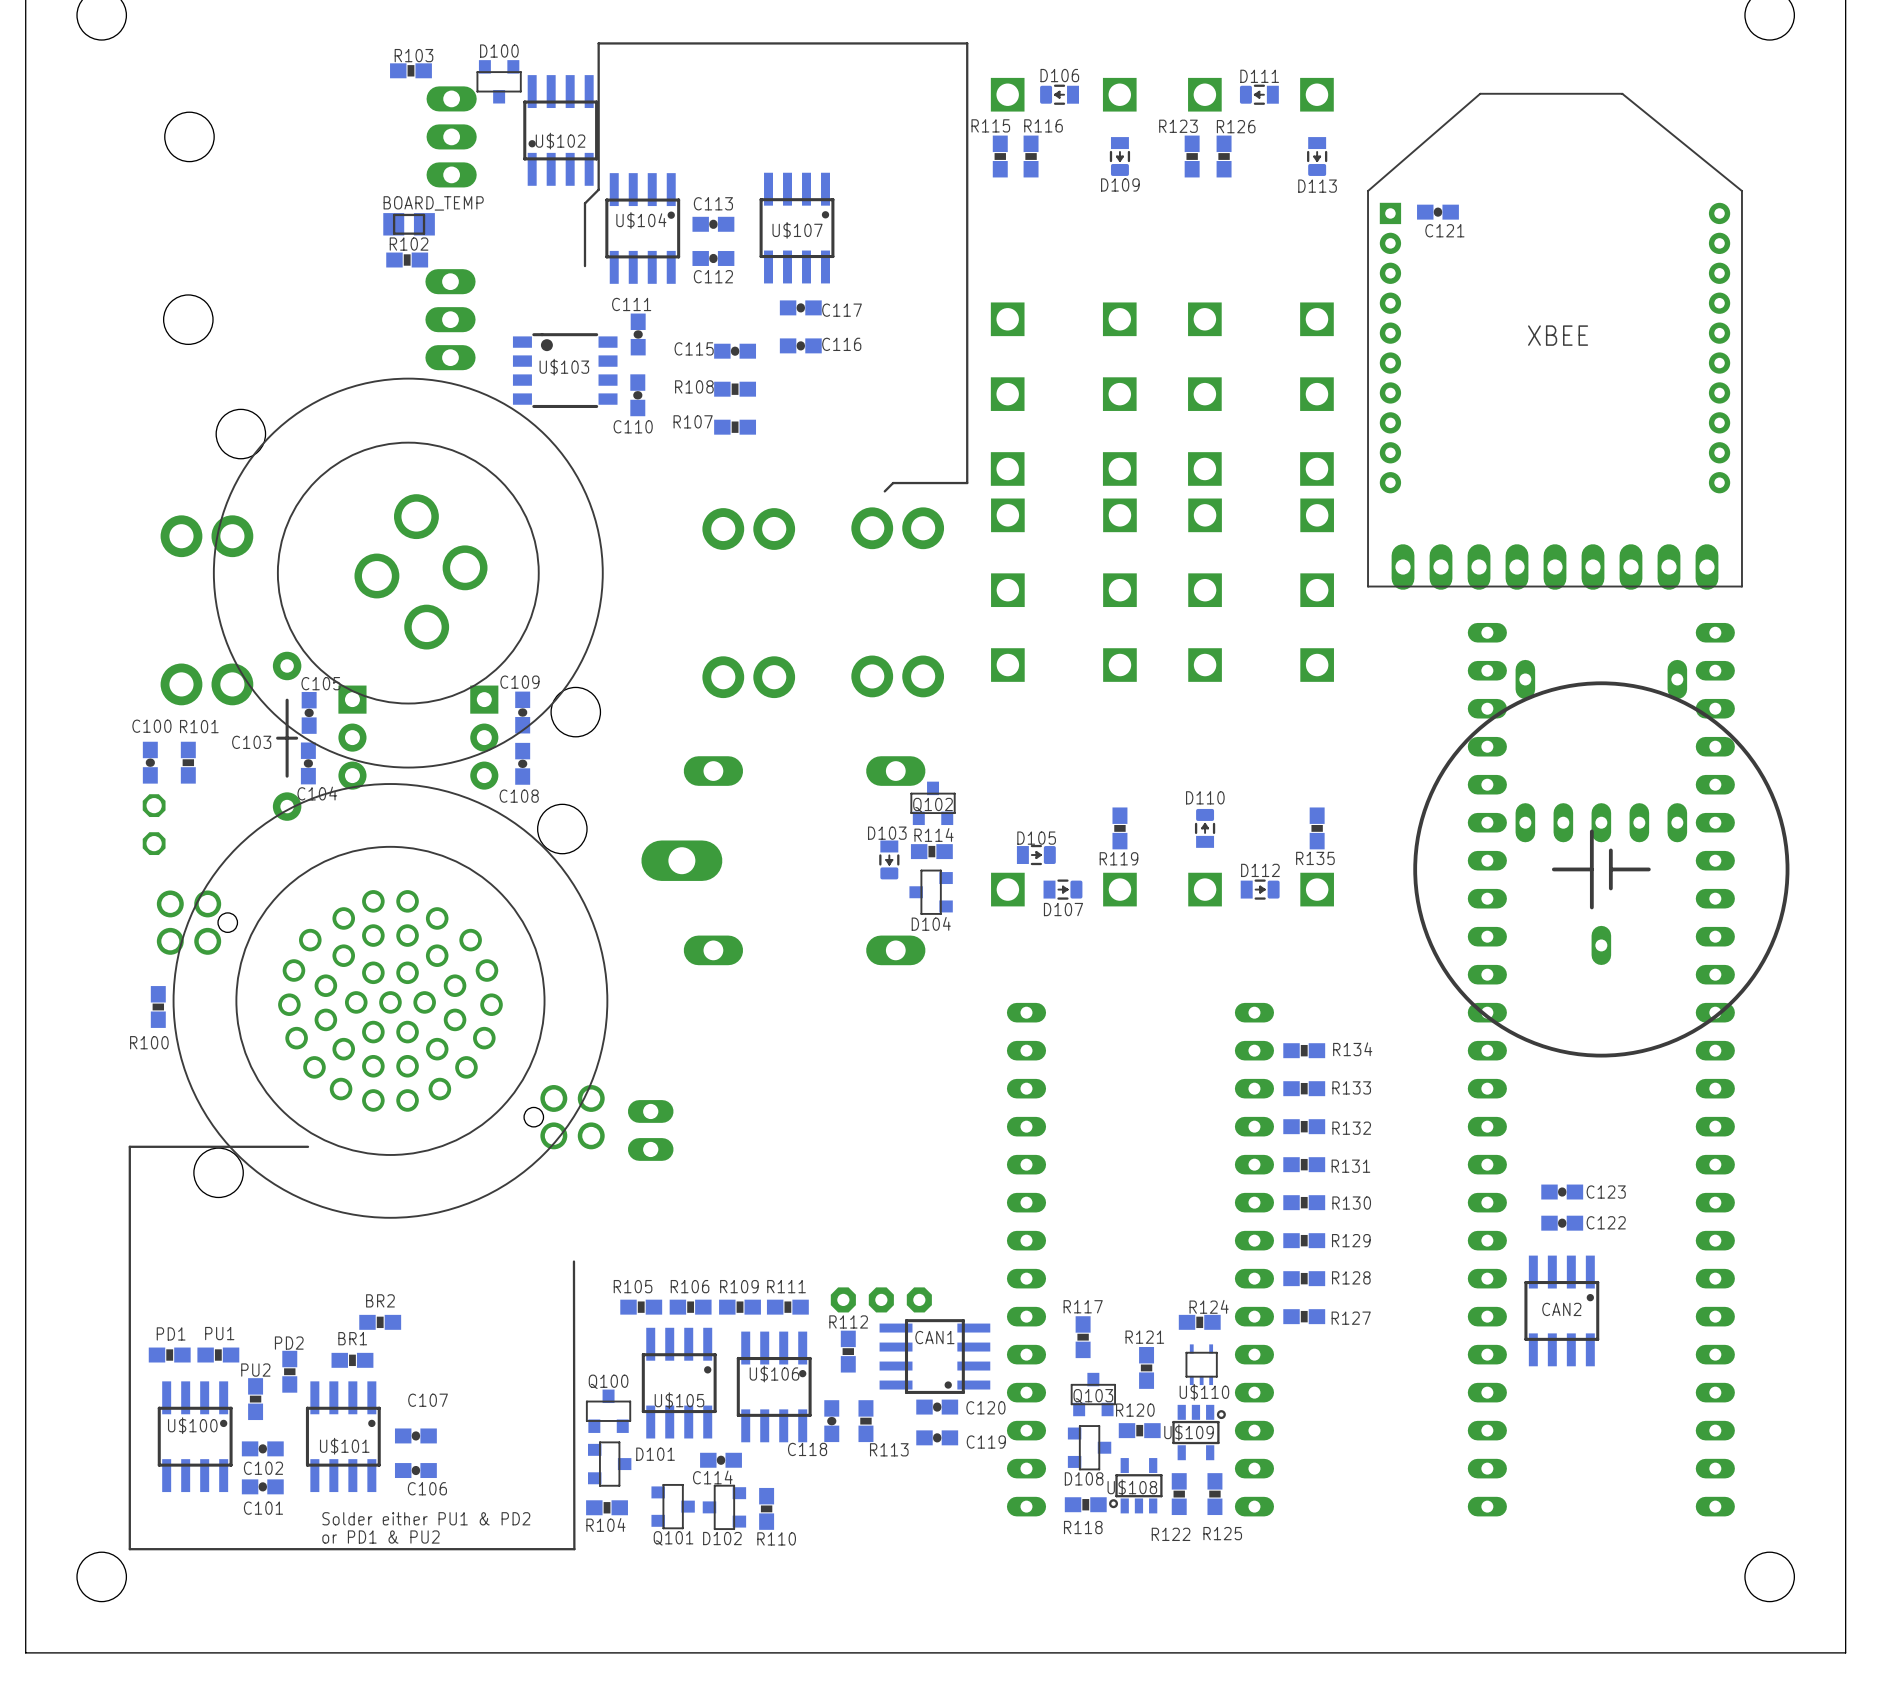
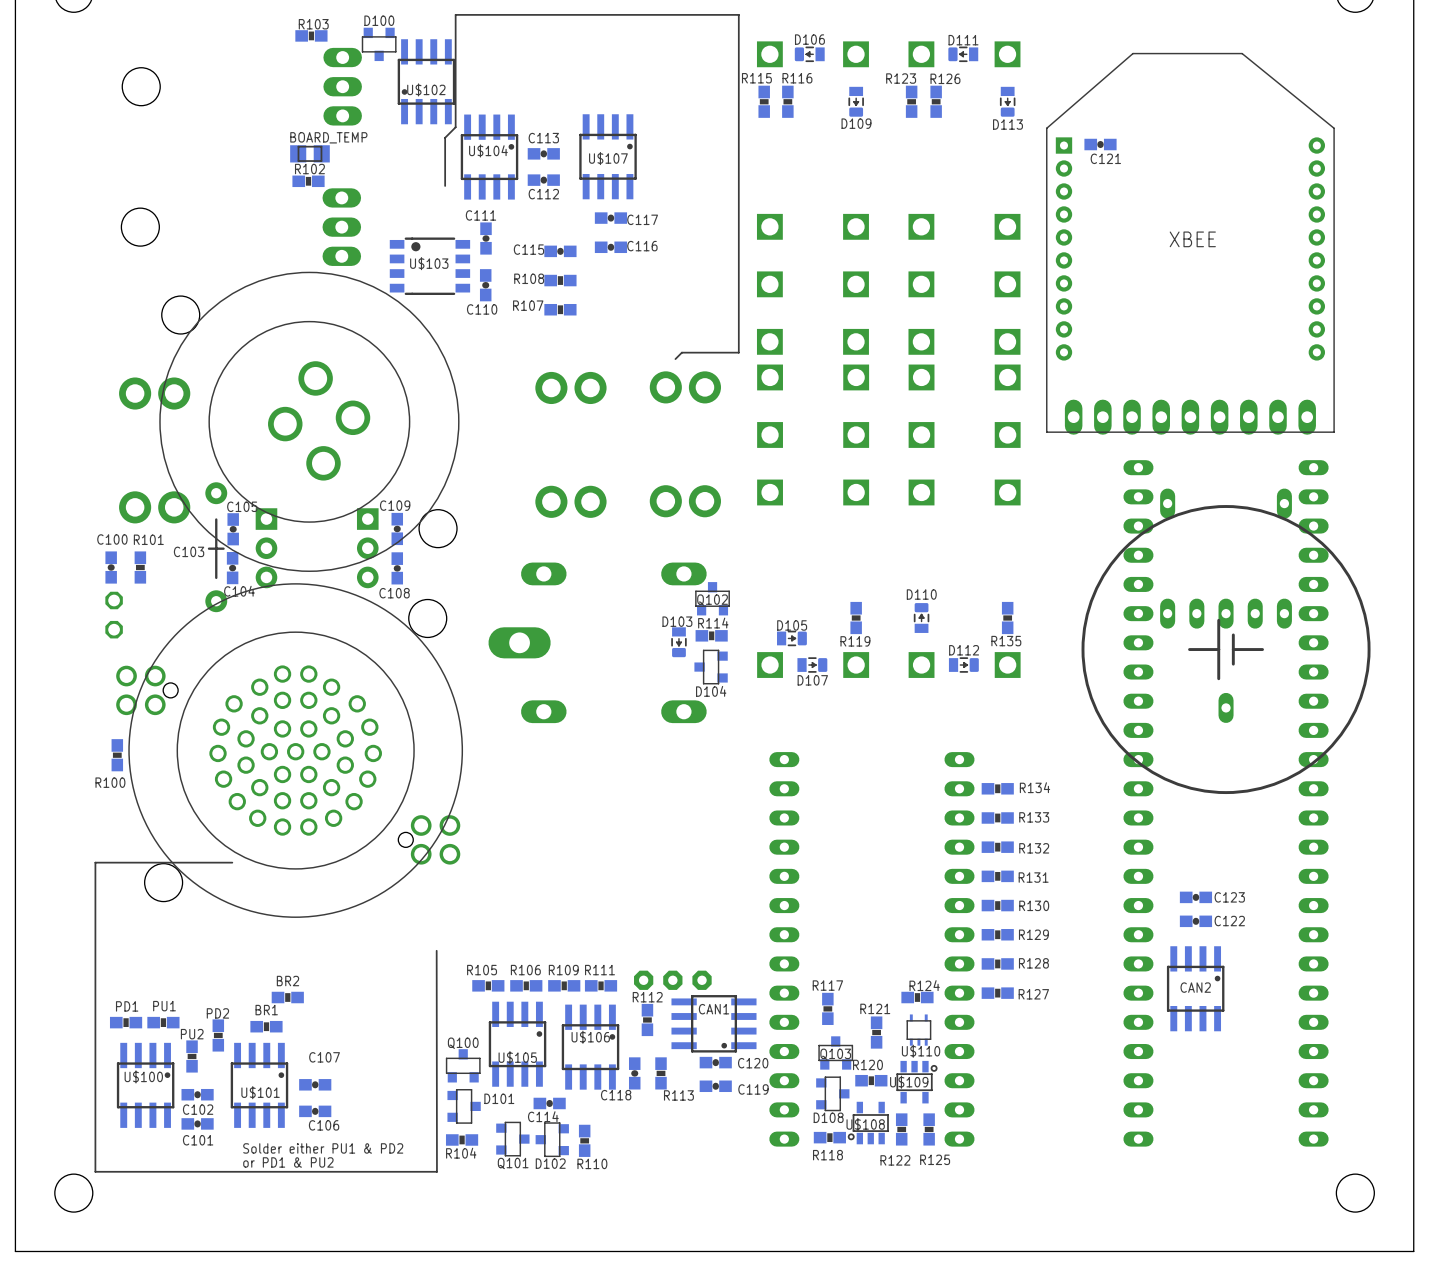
part: (650, 1130) -> none

